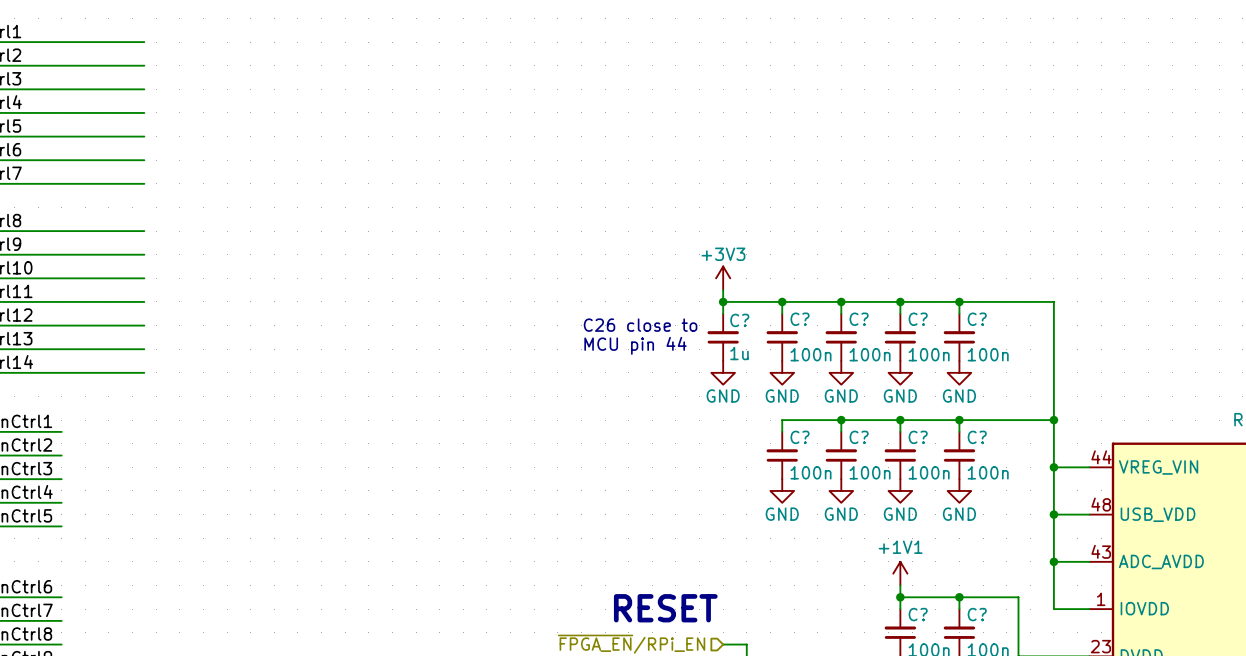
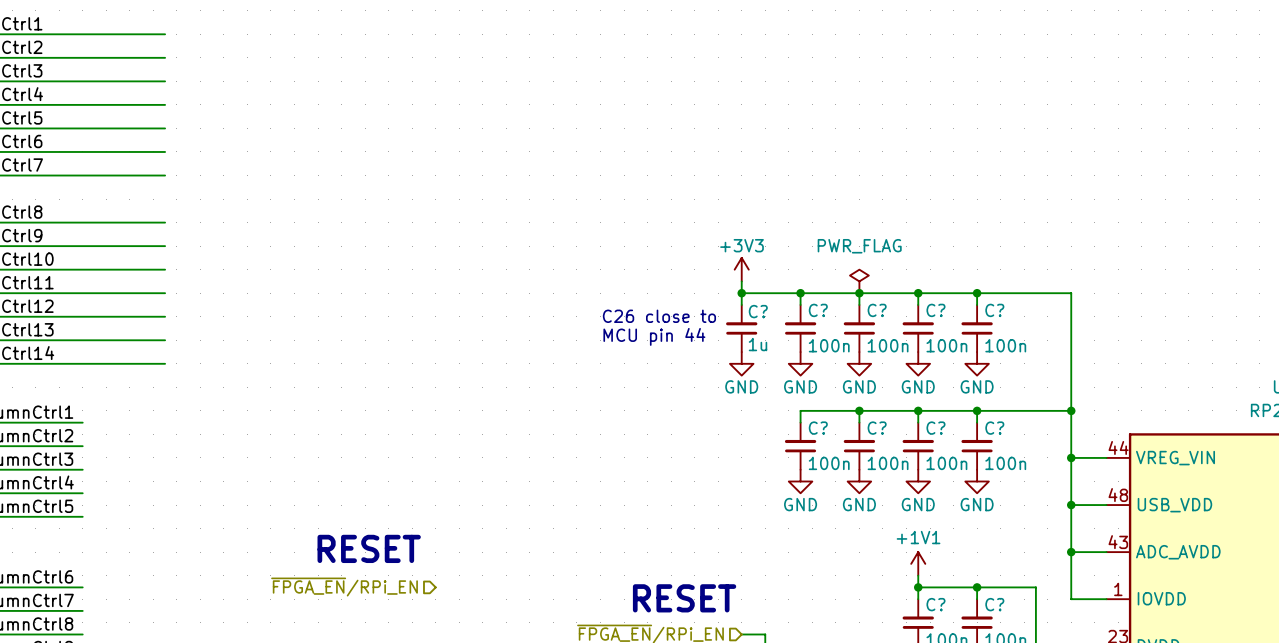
power symbol: none -> PWR_FLAG (859, 281)
text: none -> RESET (369, 548)
hierarchical label: none -> ~{FPGA_EN}/RPi_EN (344, 587)

